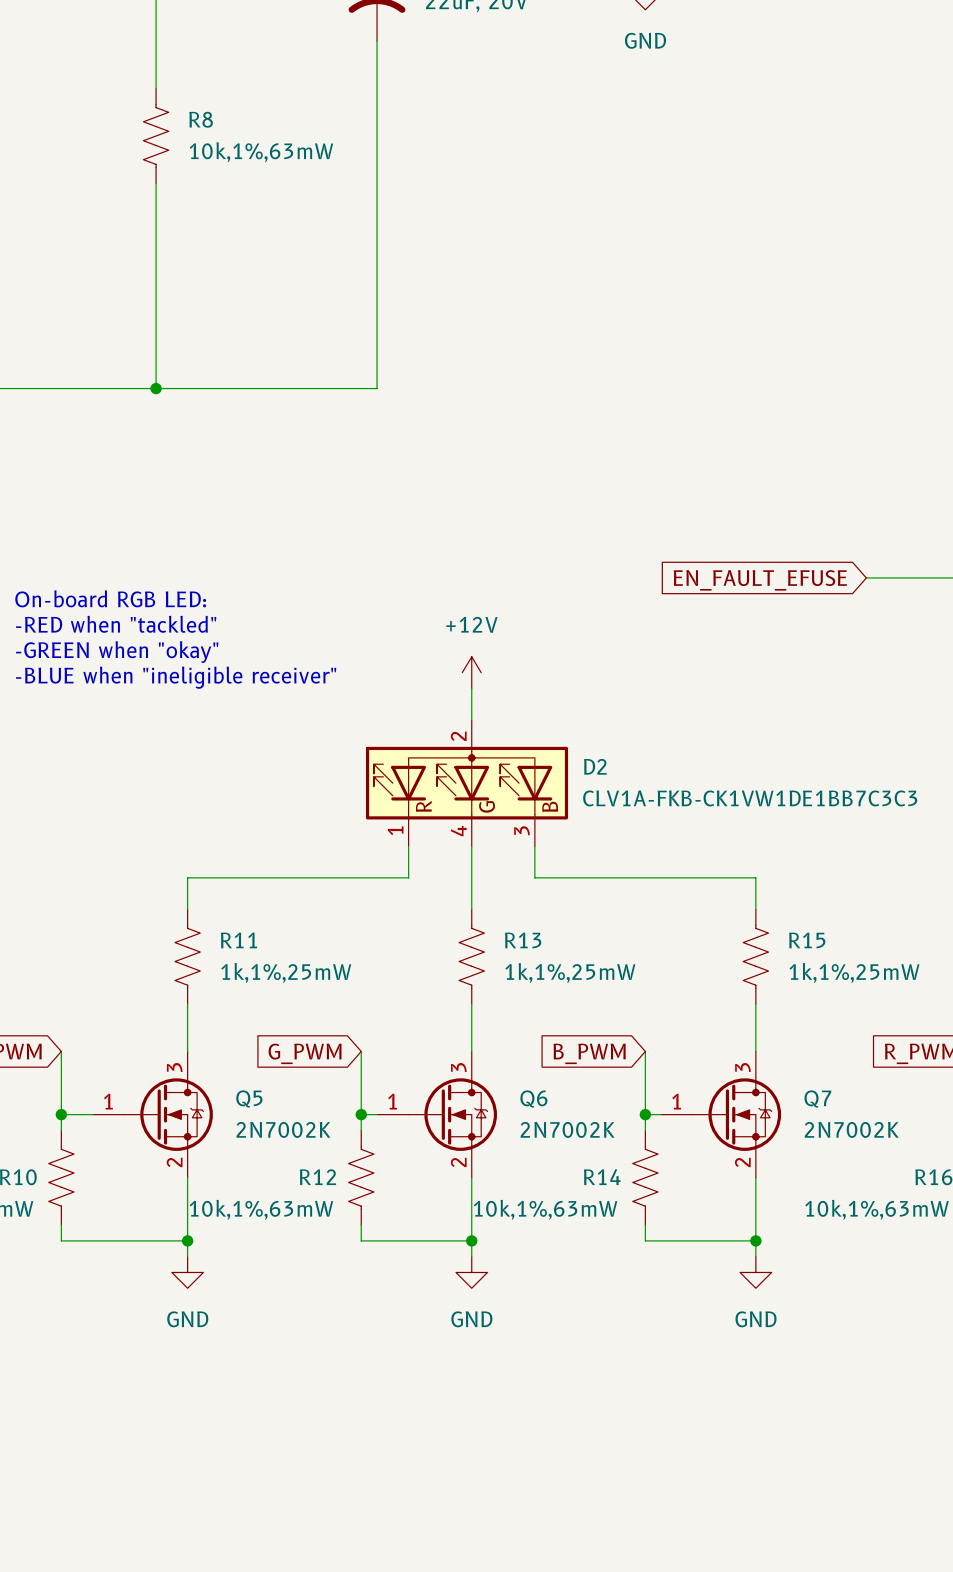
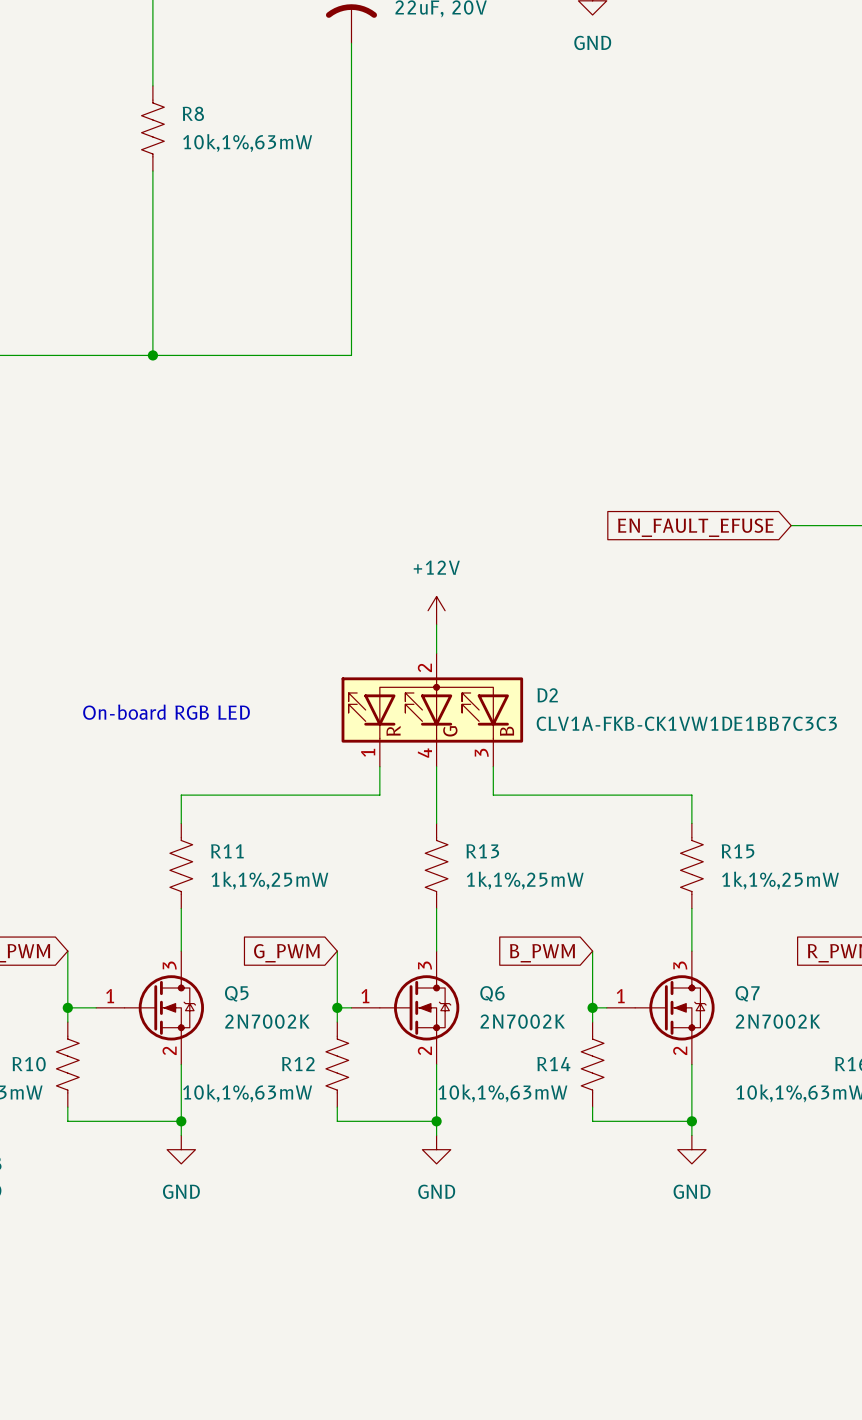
text: On-board RGB LED: (110, 598) -> none
text: -RED when "tackled" (116, 624) -> none
text: -GREEN when "okay" (117, 652) -> none
text: -BLUE when "ineligible receiver" (176, 677) -> none
text: none -> On-board RGB LED (166, 712)

